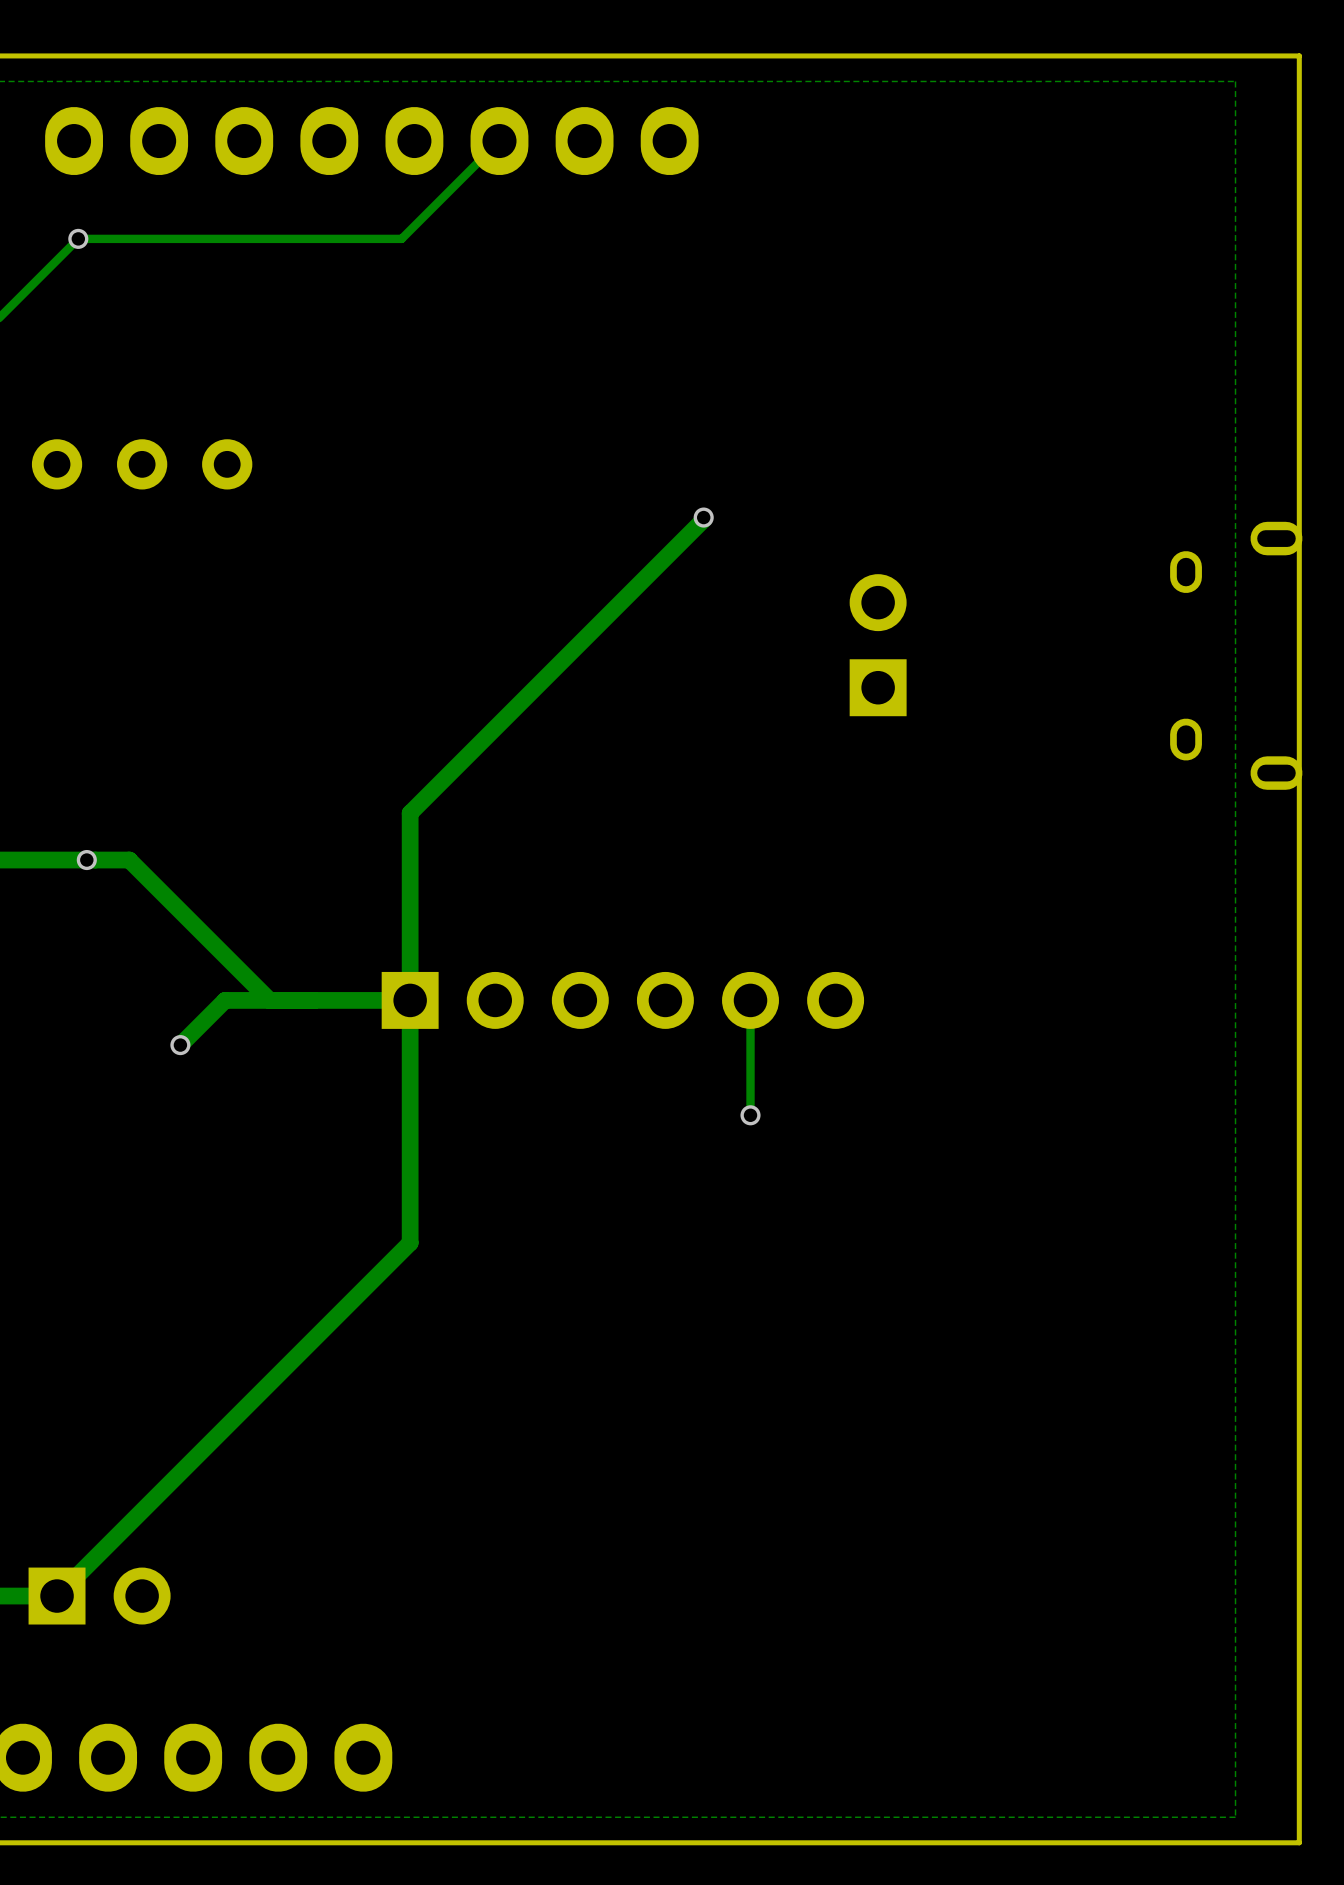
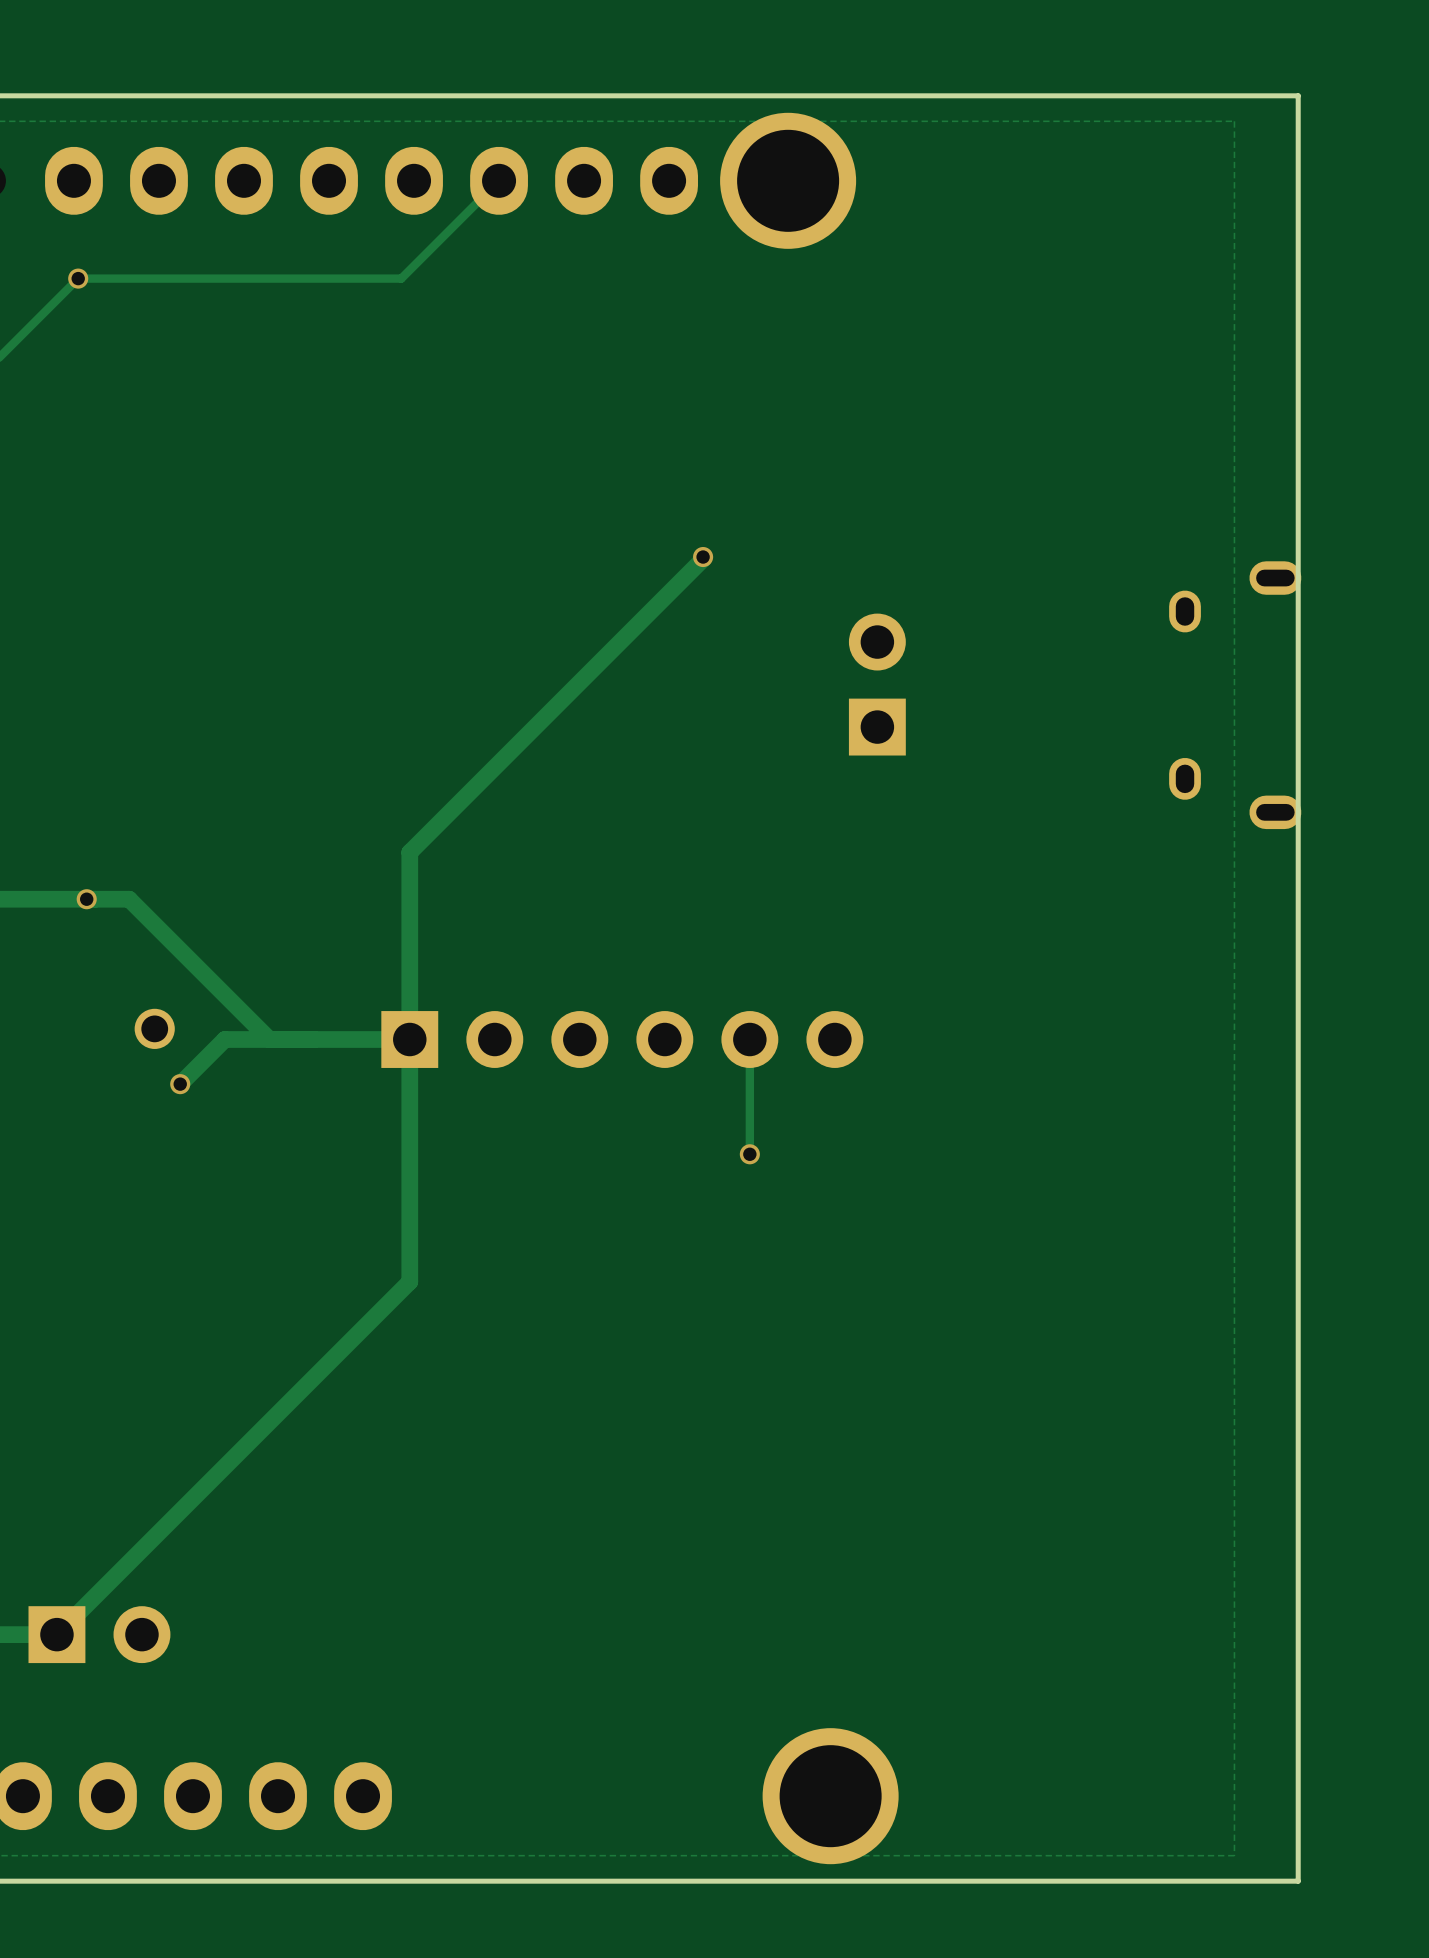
part: none -> (788, 180)
part: (57, 464) -> none
part: (142, 464) -> none
part: (227, 464) -> none
part: none -> (154, 1028)
part: none -> (830, 1796)

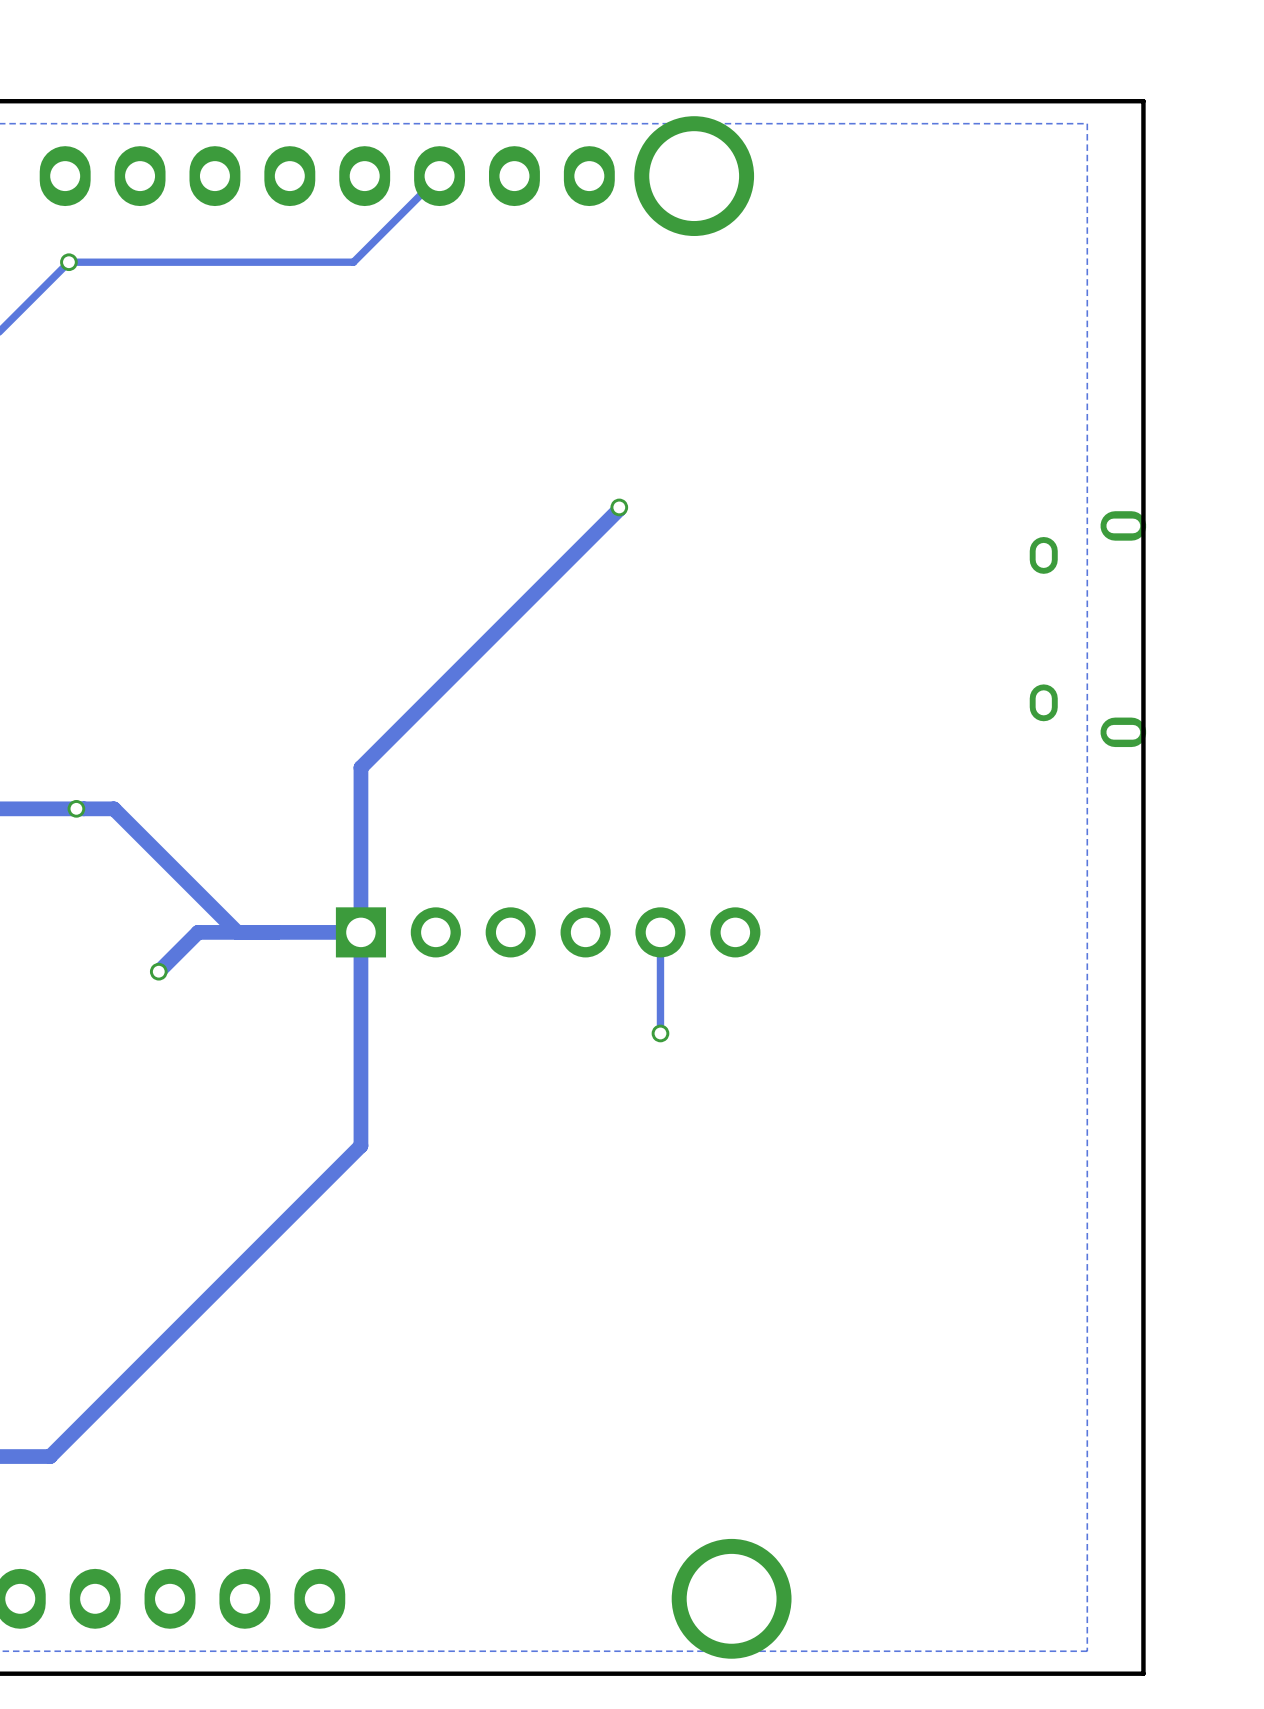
part: (877, 684) -> none
part: (154, 1028) -> none
part: (99, 1634) -> none

